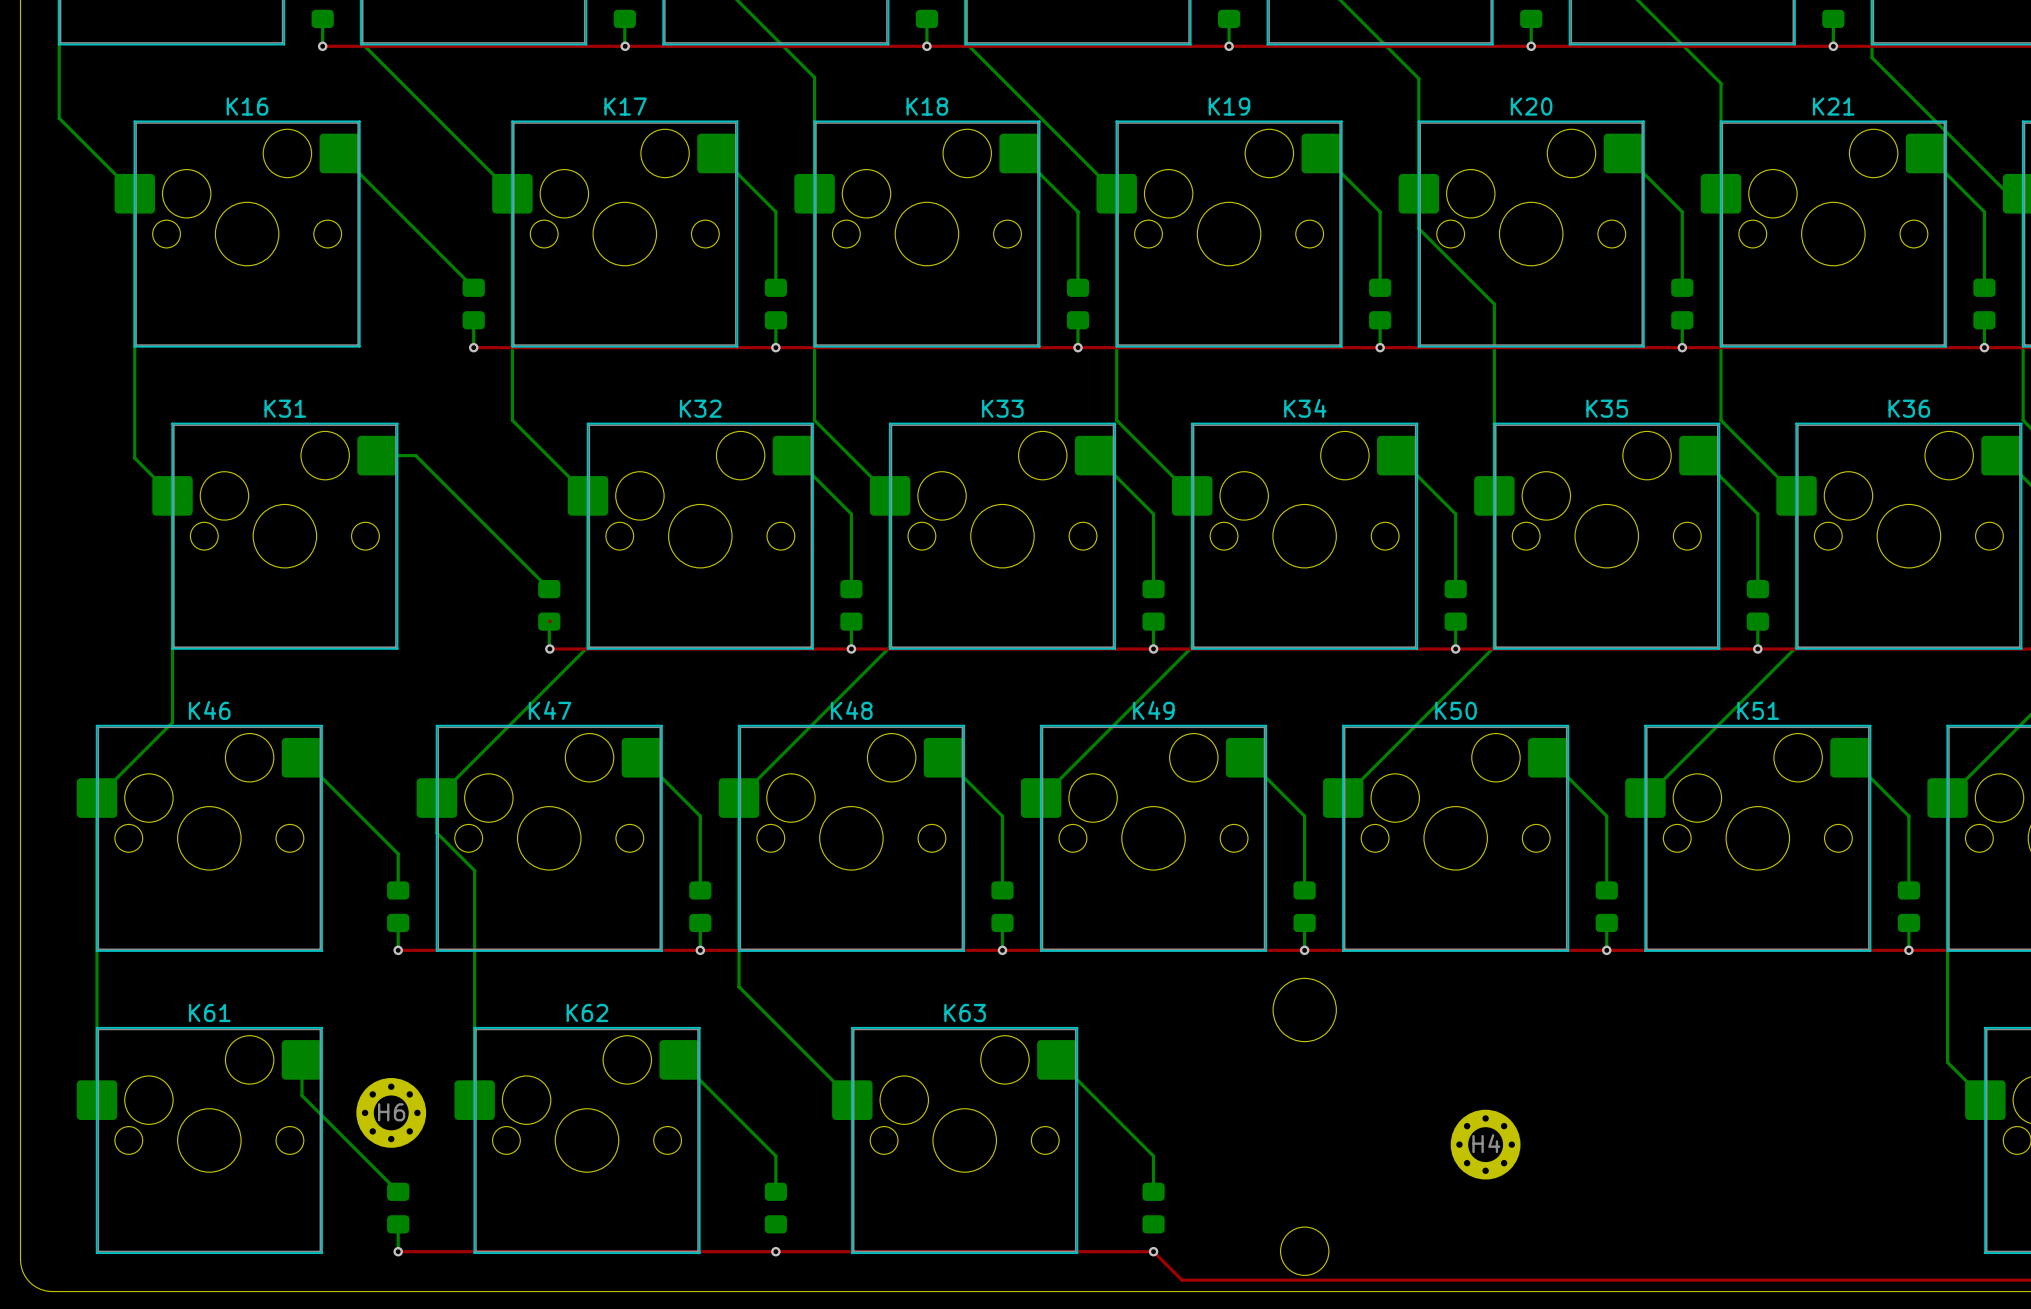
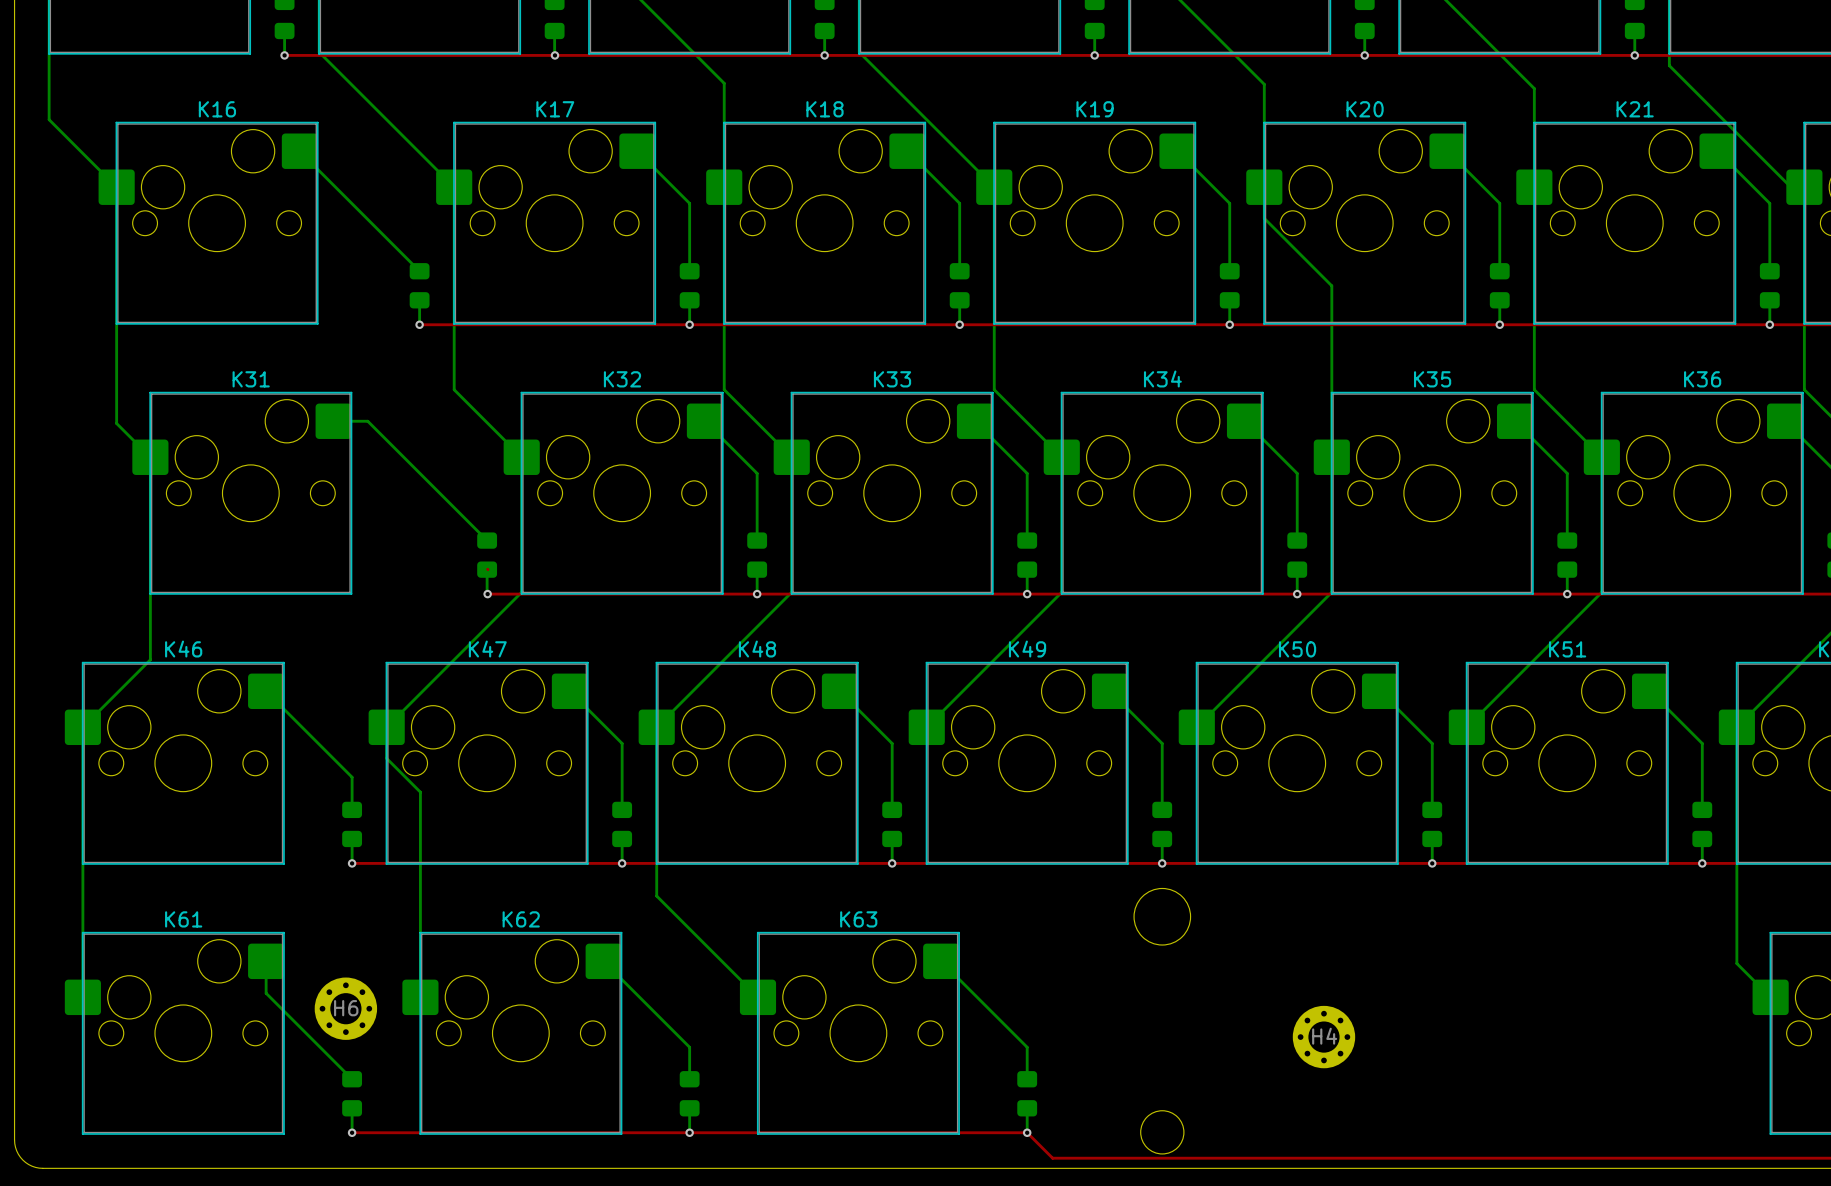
bottom track: none -> (689, 1108) (689, 1132)
bottom track: none -> (1027, 1108) (1027, 1132)

